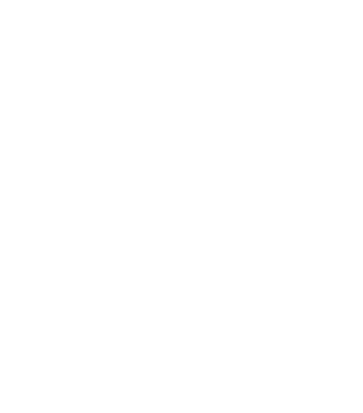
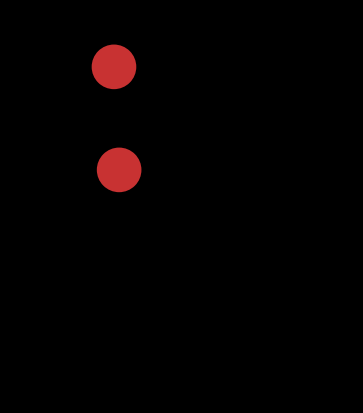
part: none -> (113, 66)
part: none -> (119, 169)

